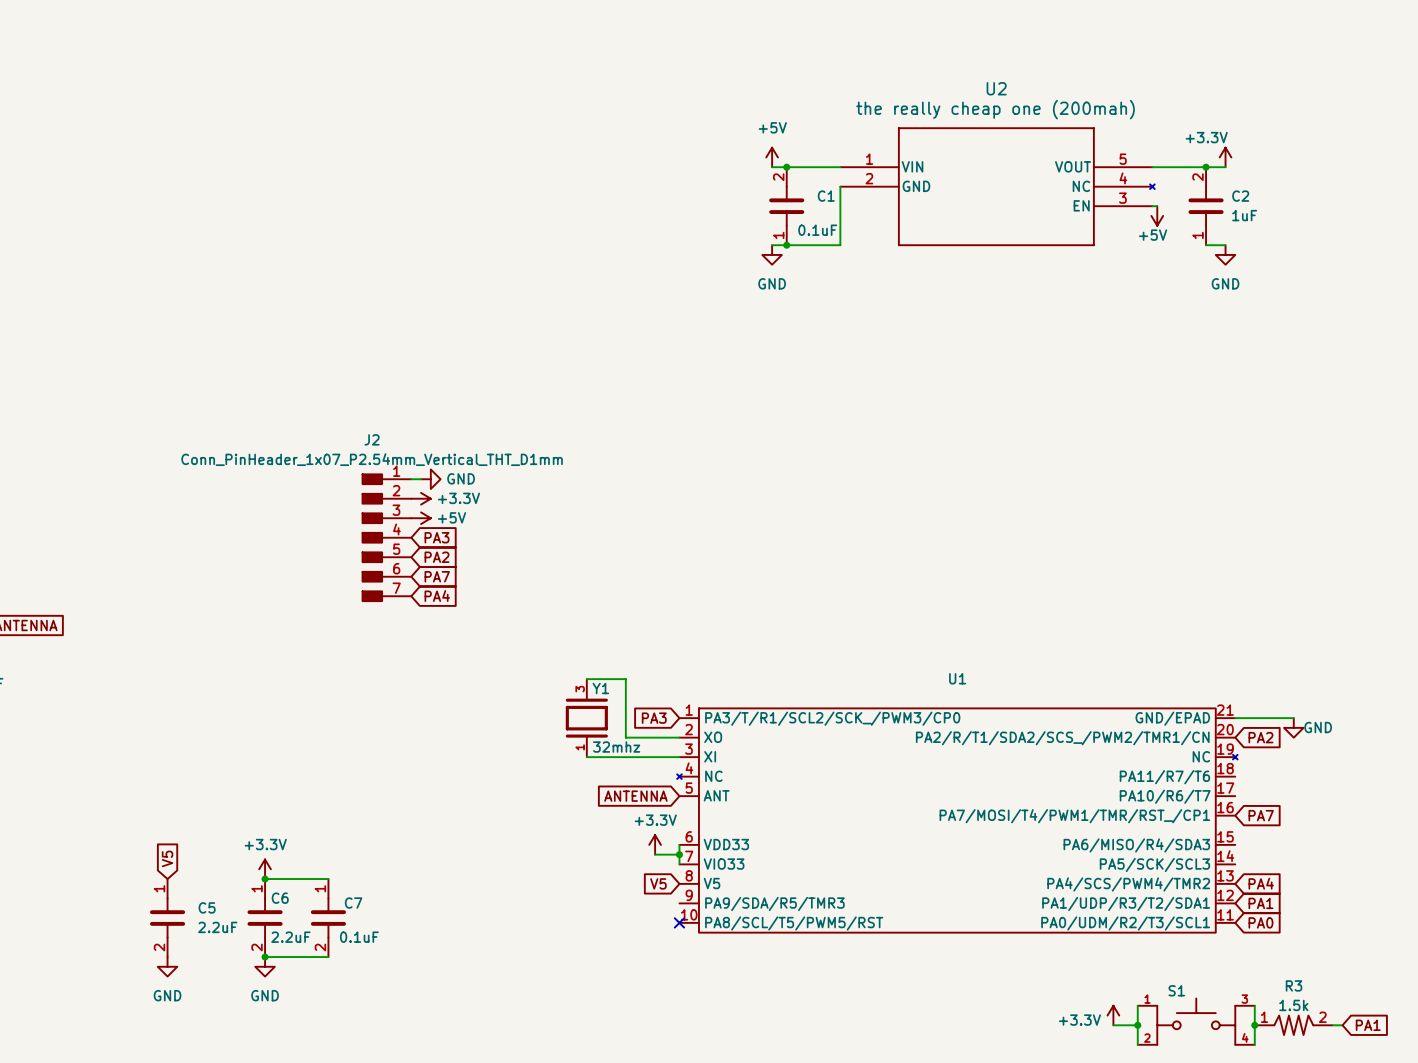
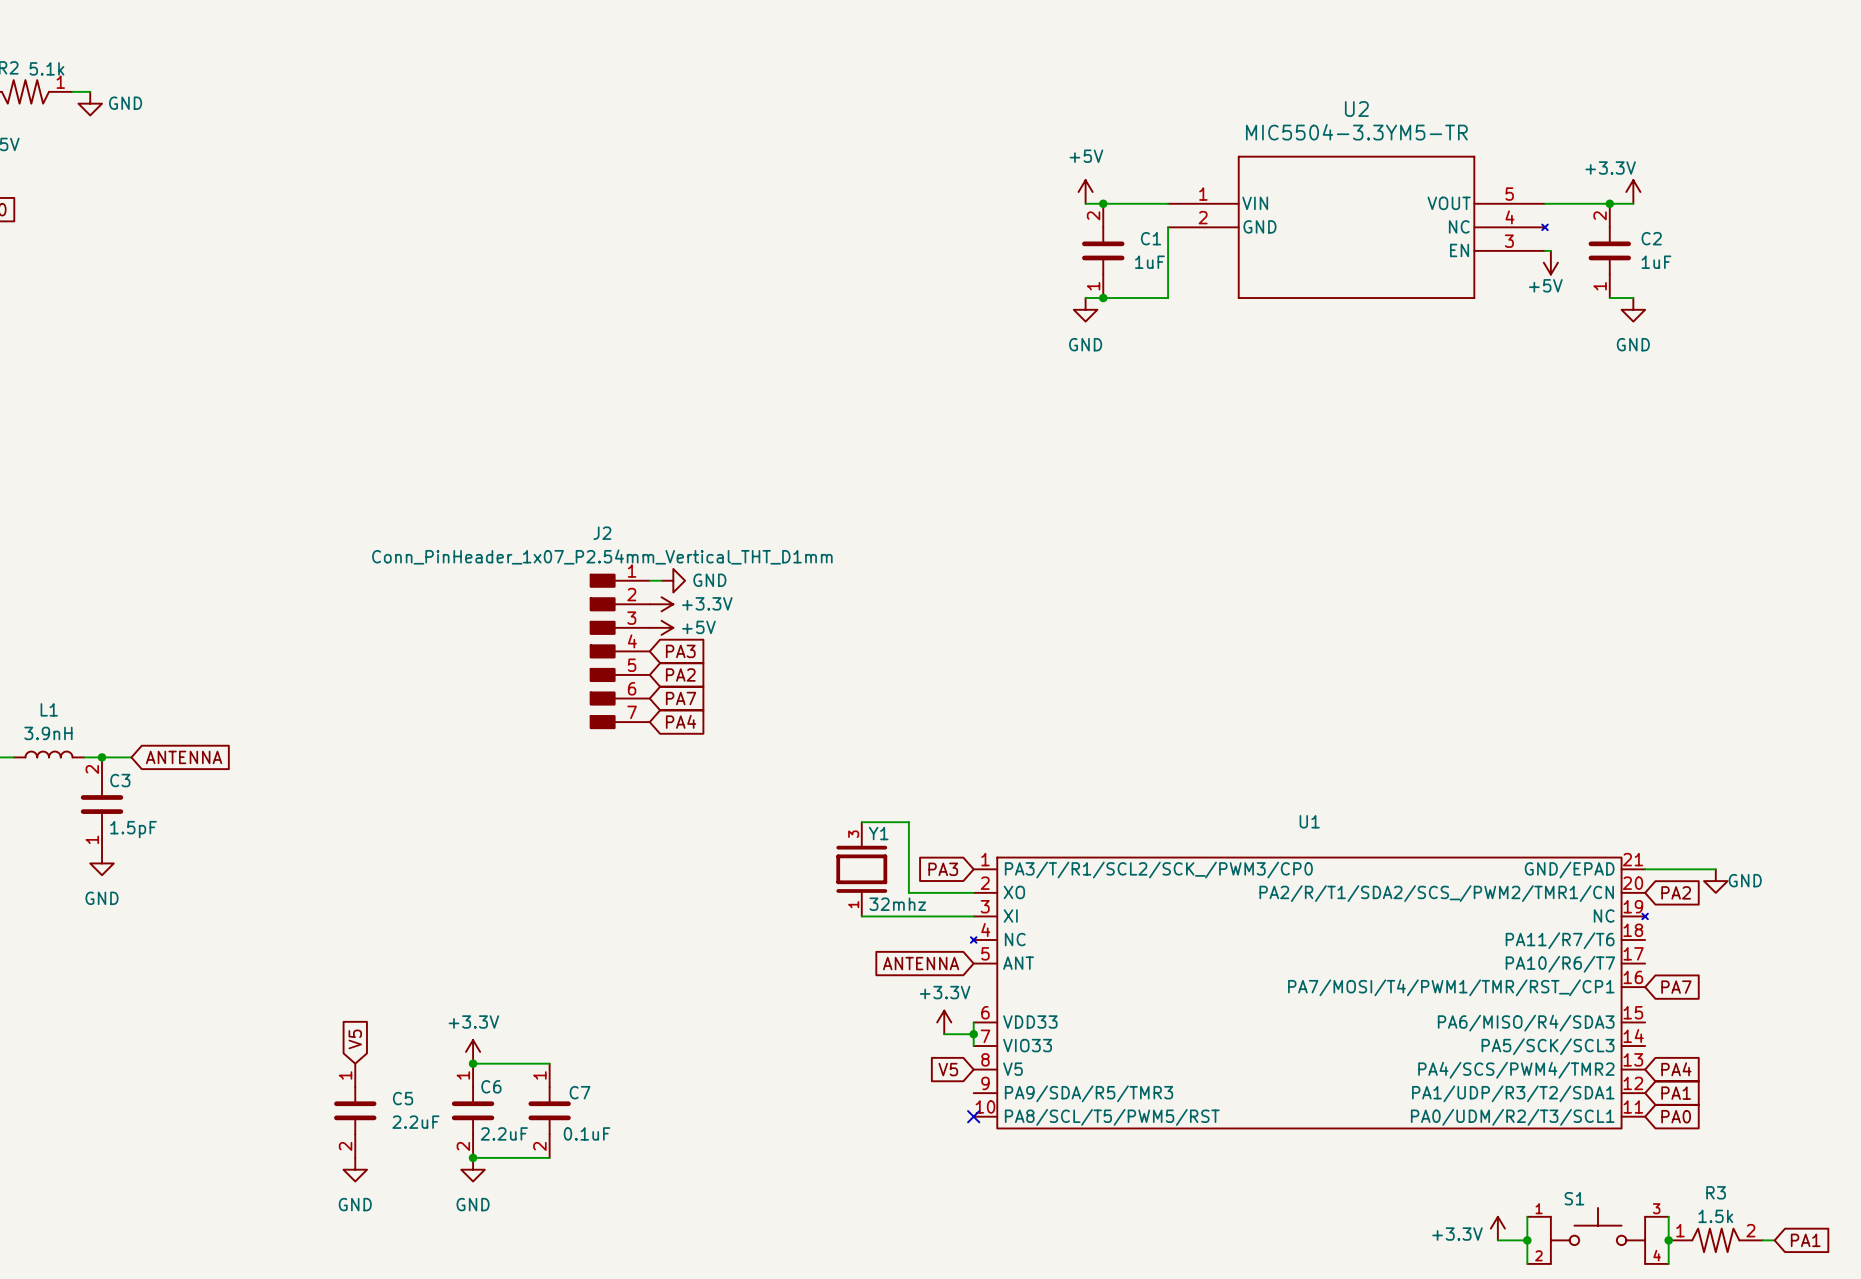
U2 value: the really cheap one (200mah) (995, 109) -> MIC5504-3.3YM5-TR (1356, 132)
C1 value: 0.1uF (817, 230) -> 1uF (1149, 262)

